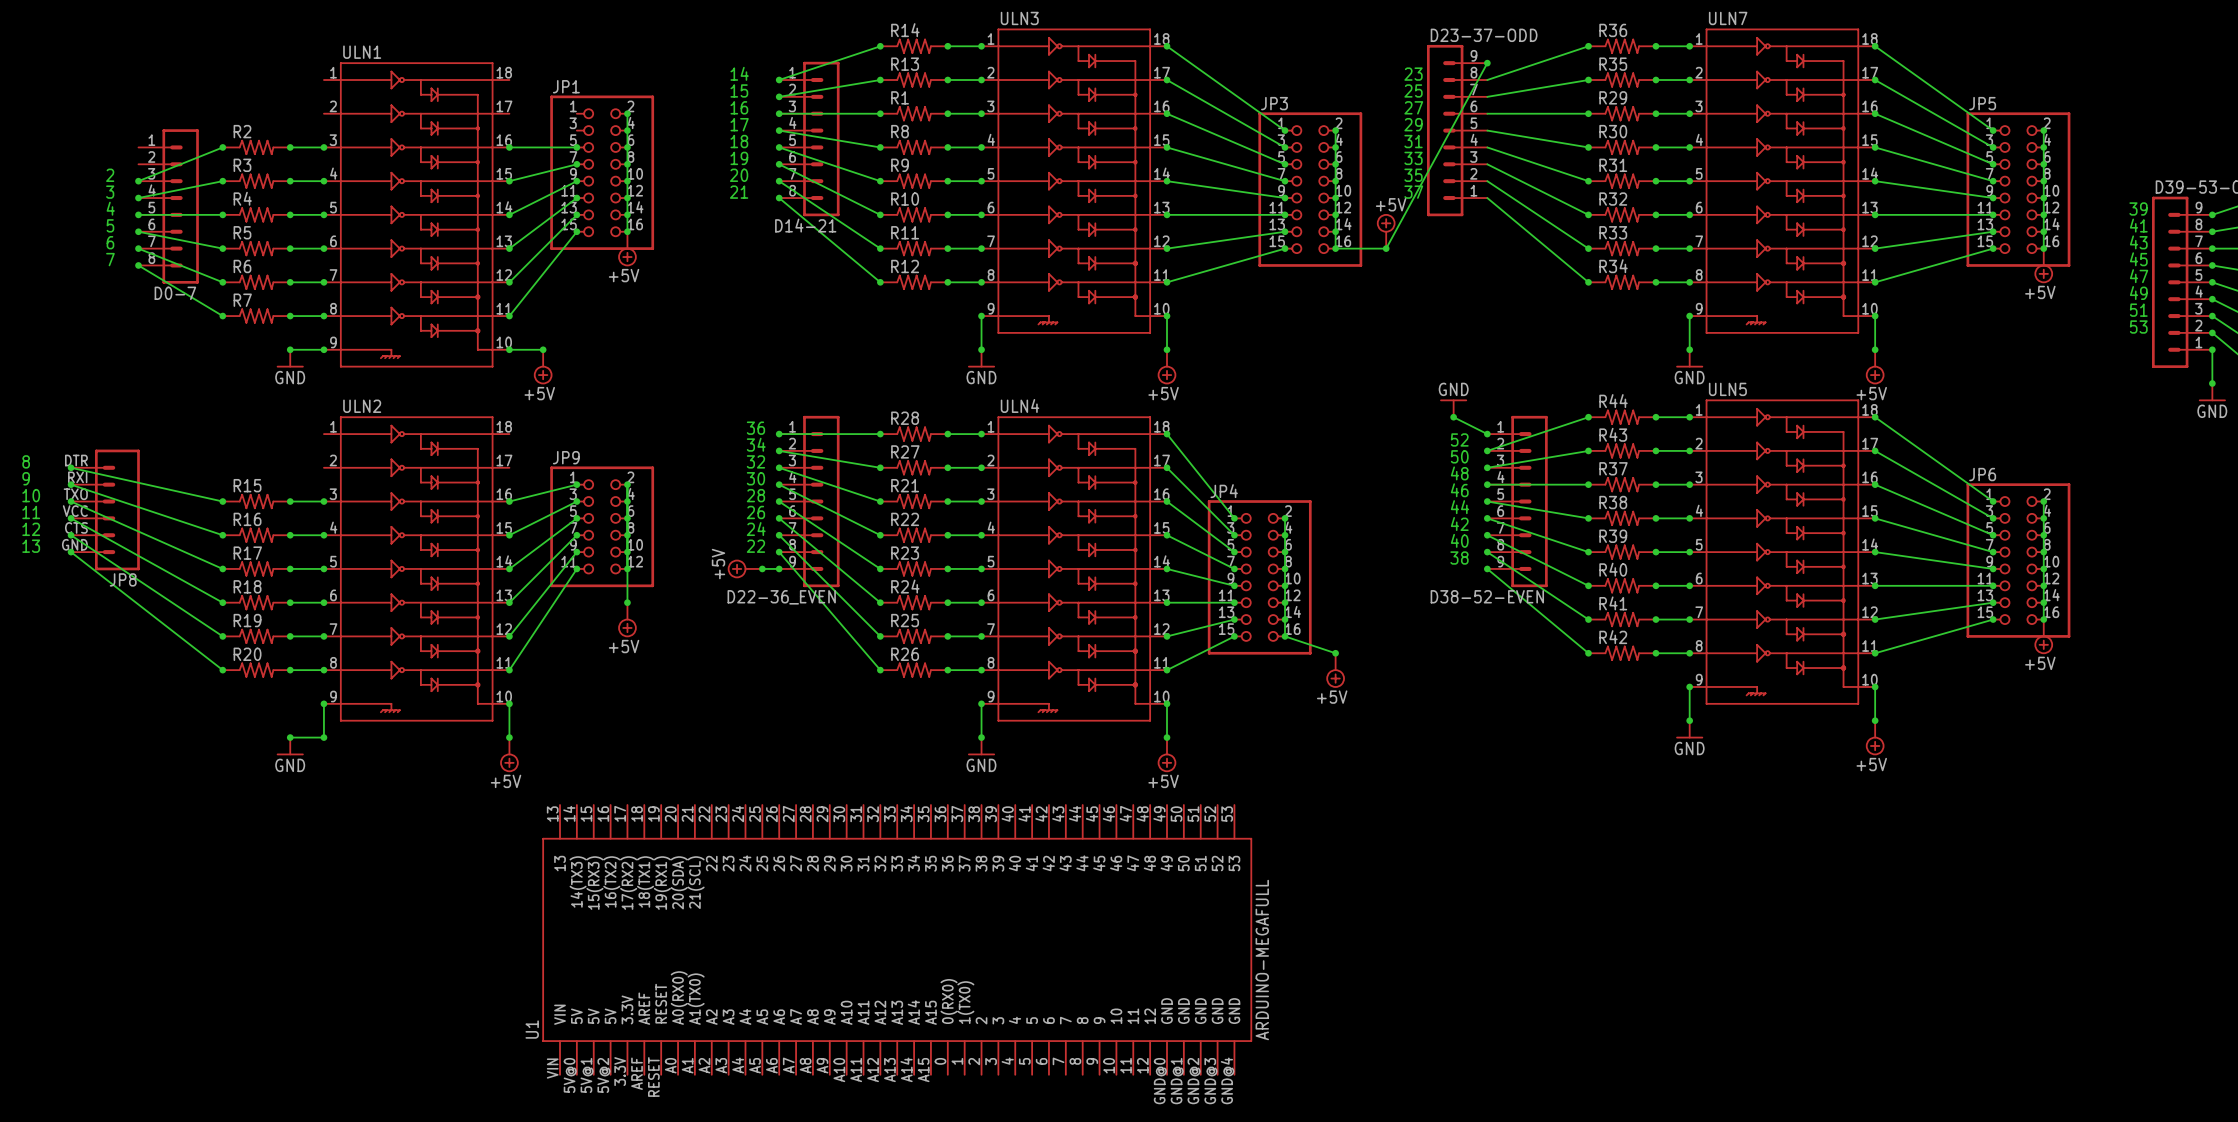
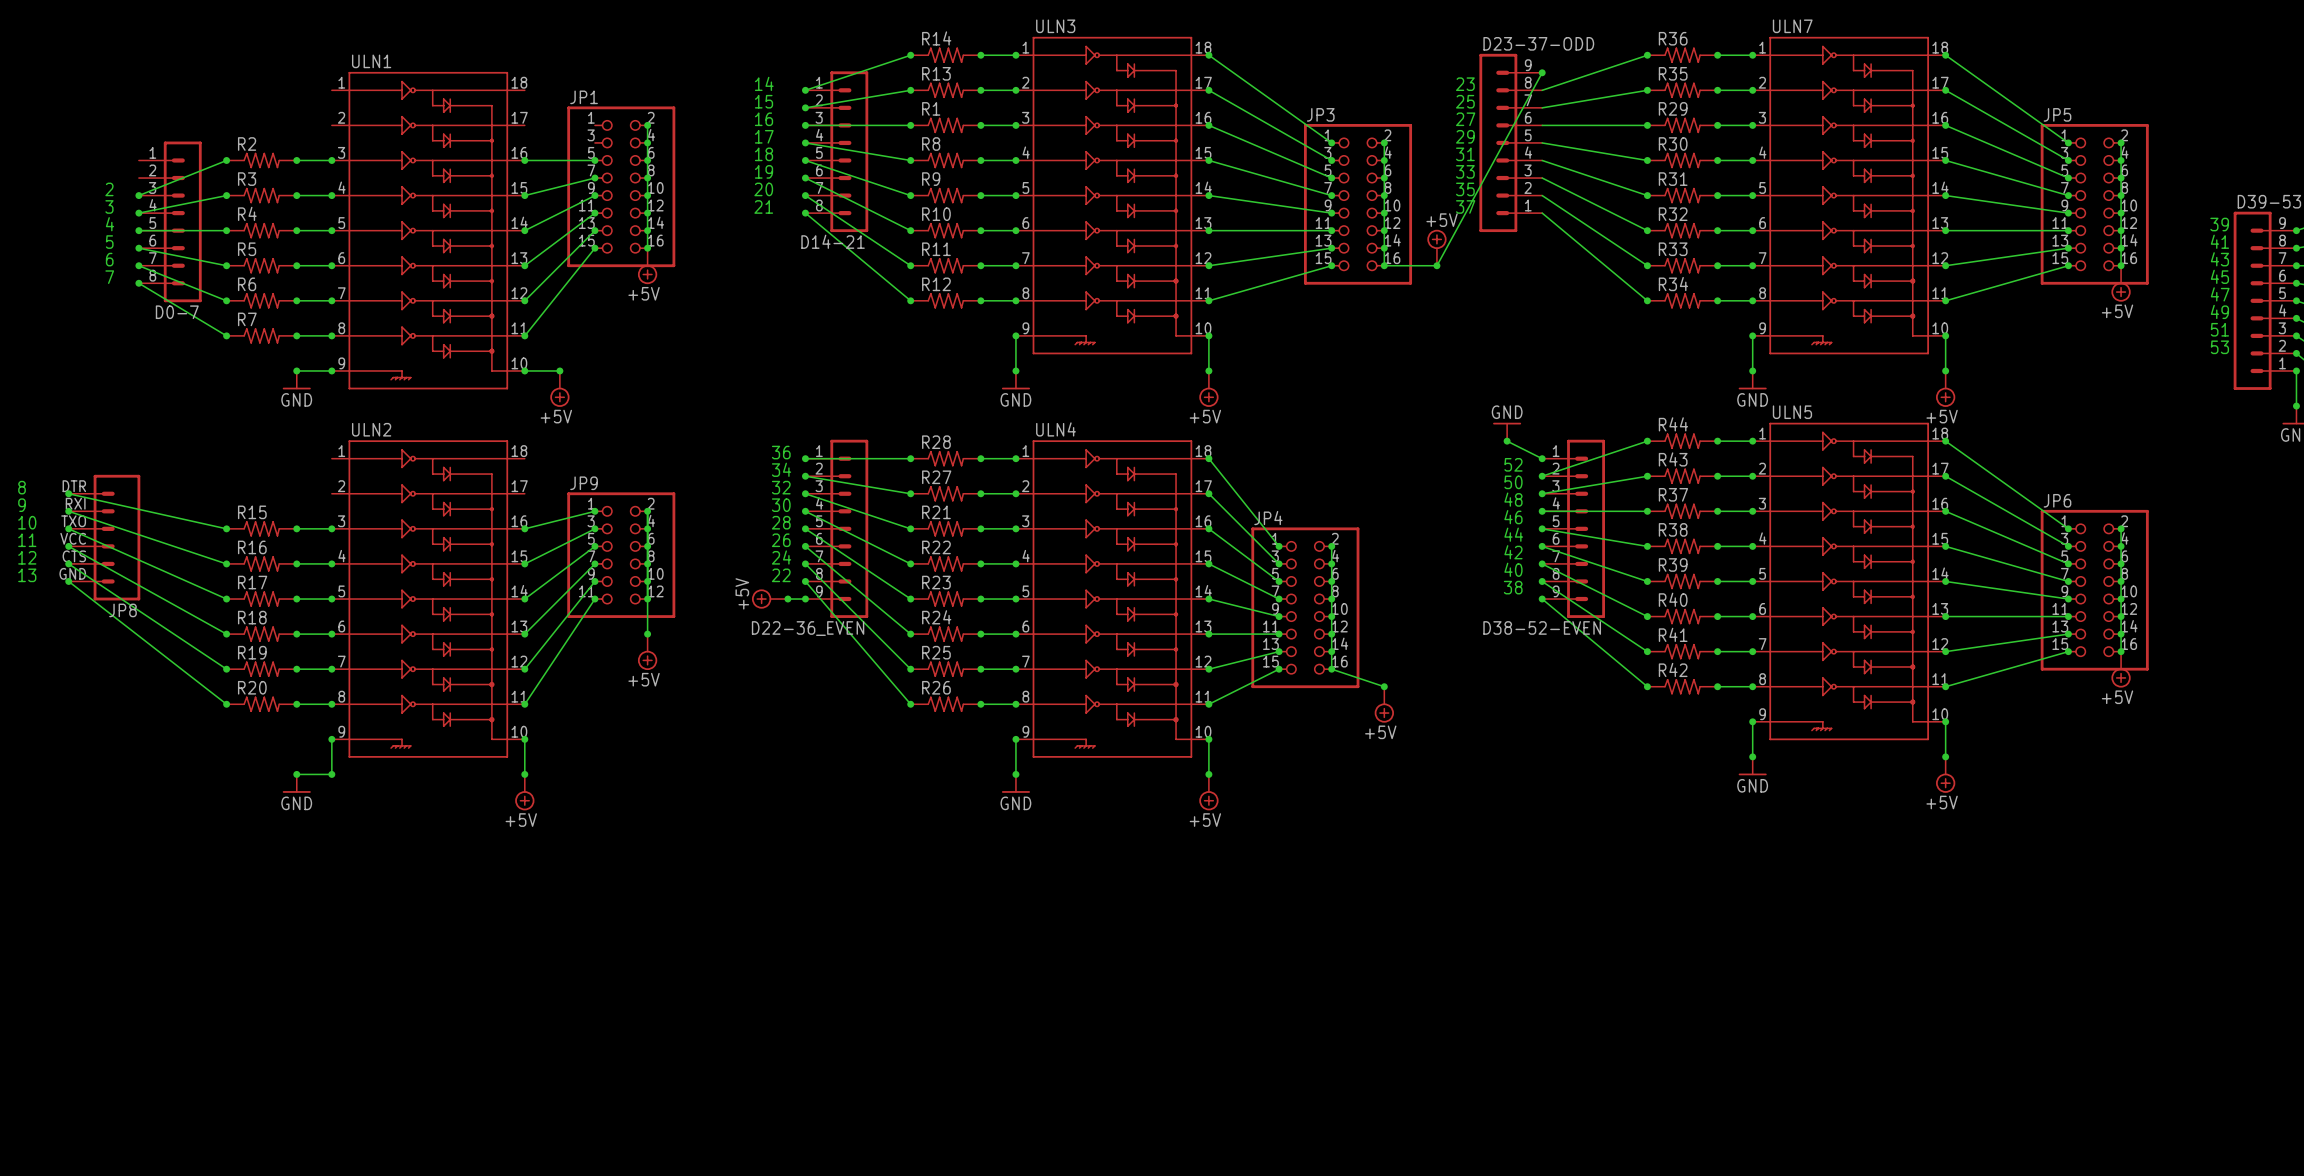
U1: ARDUINO-MEGAFULL (897, 939) -> none

